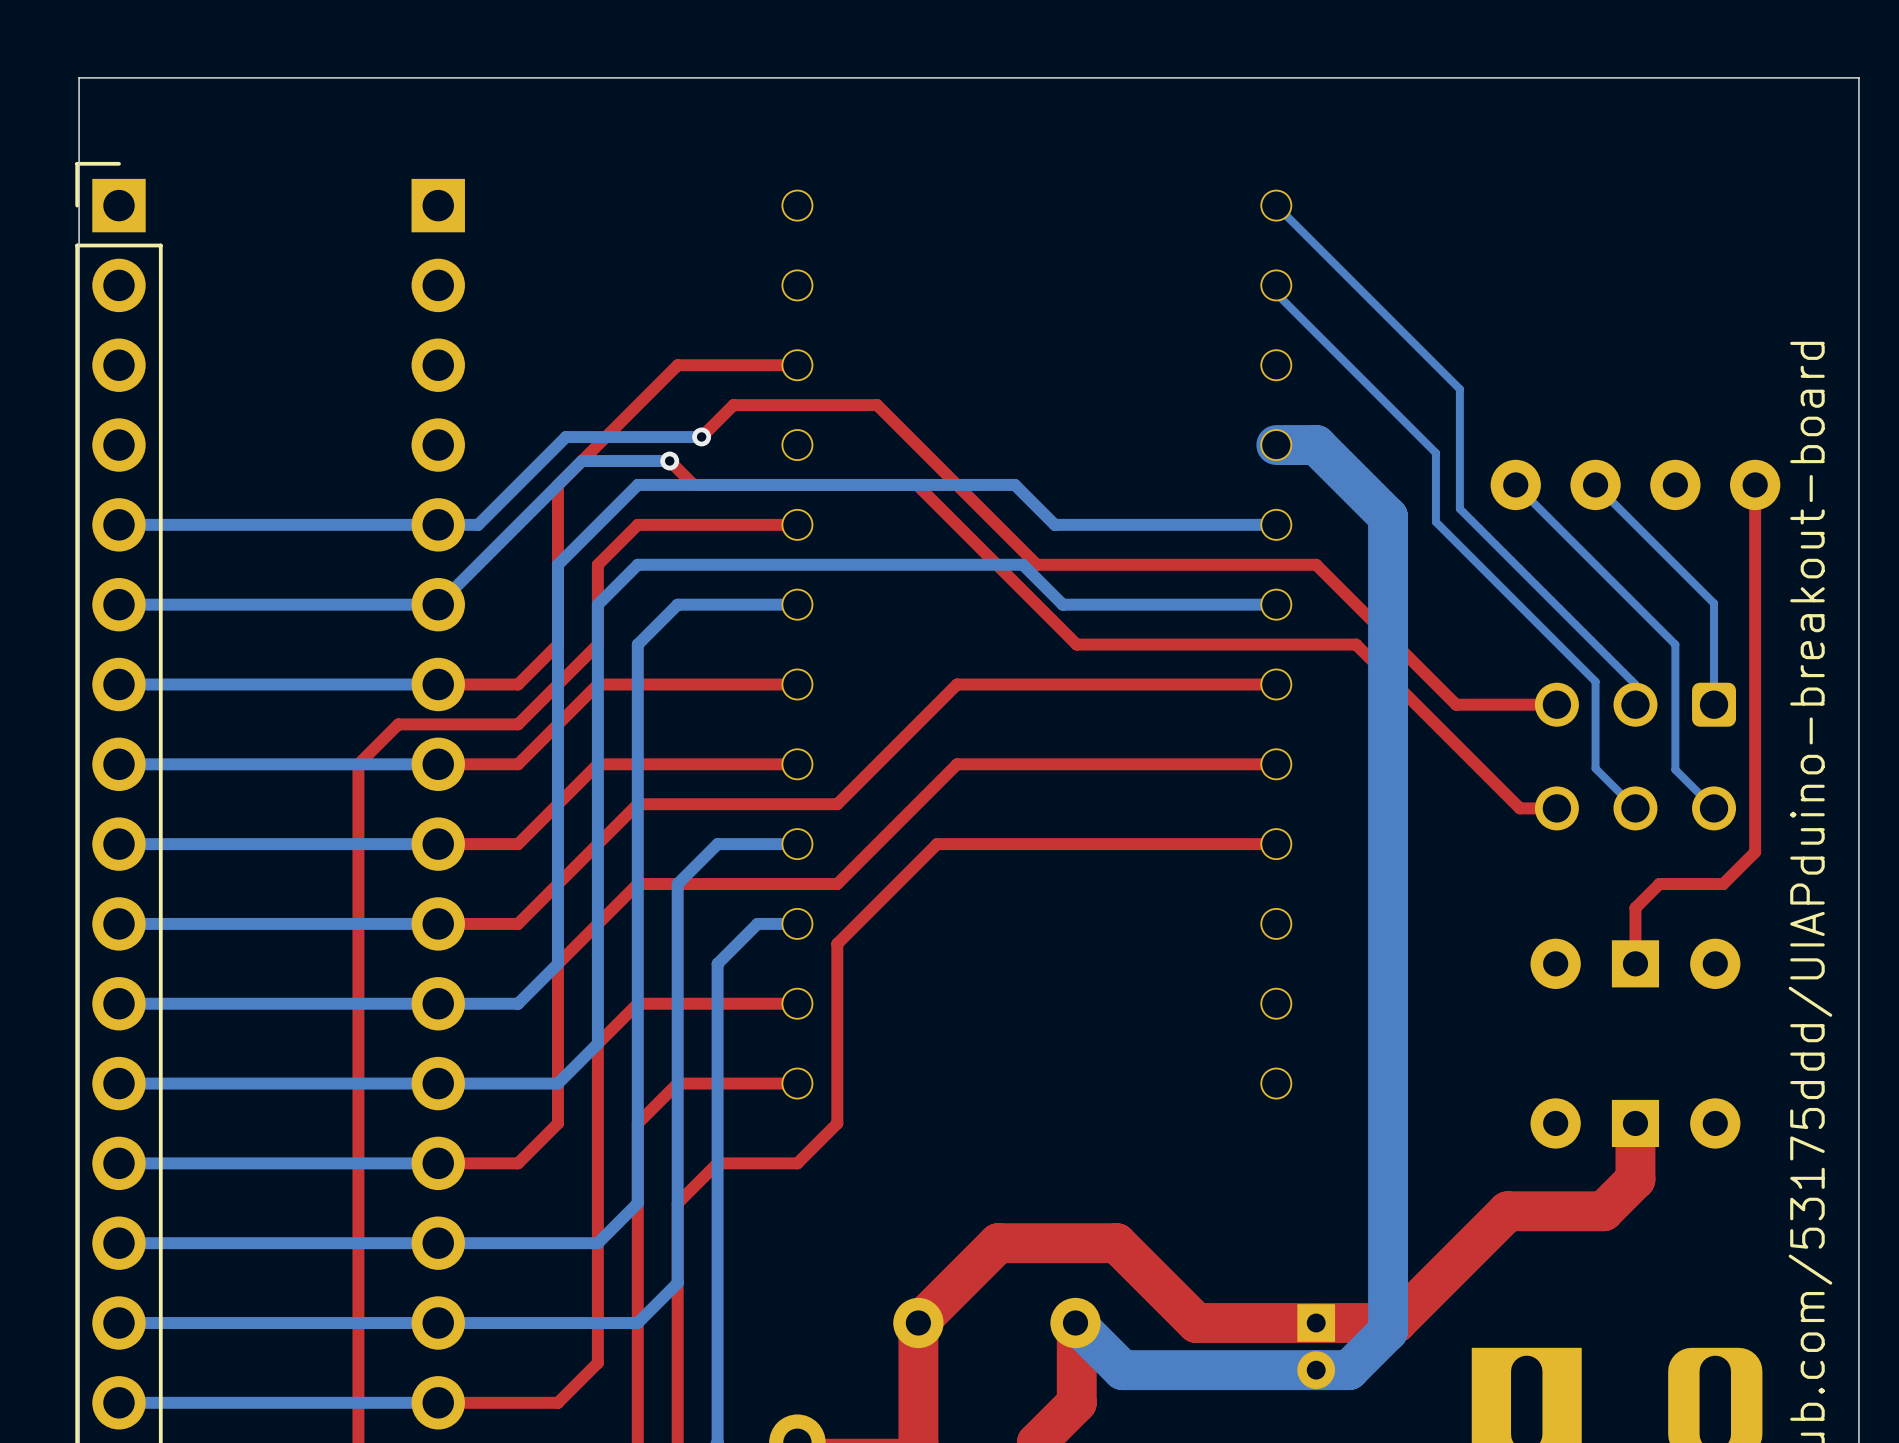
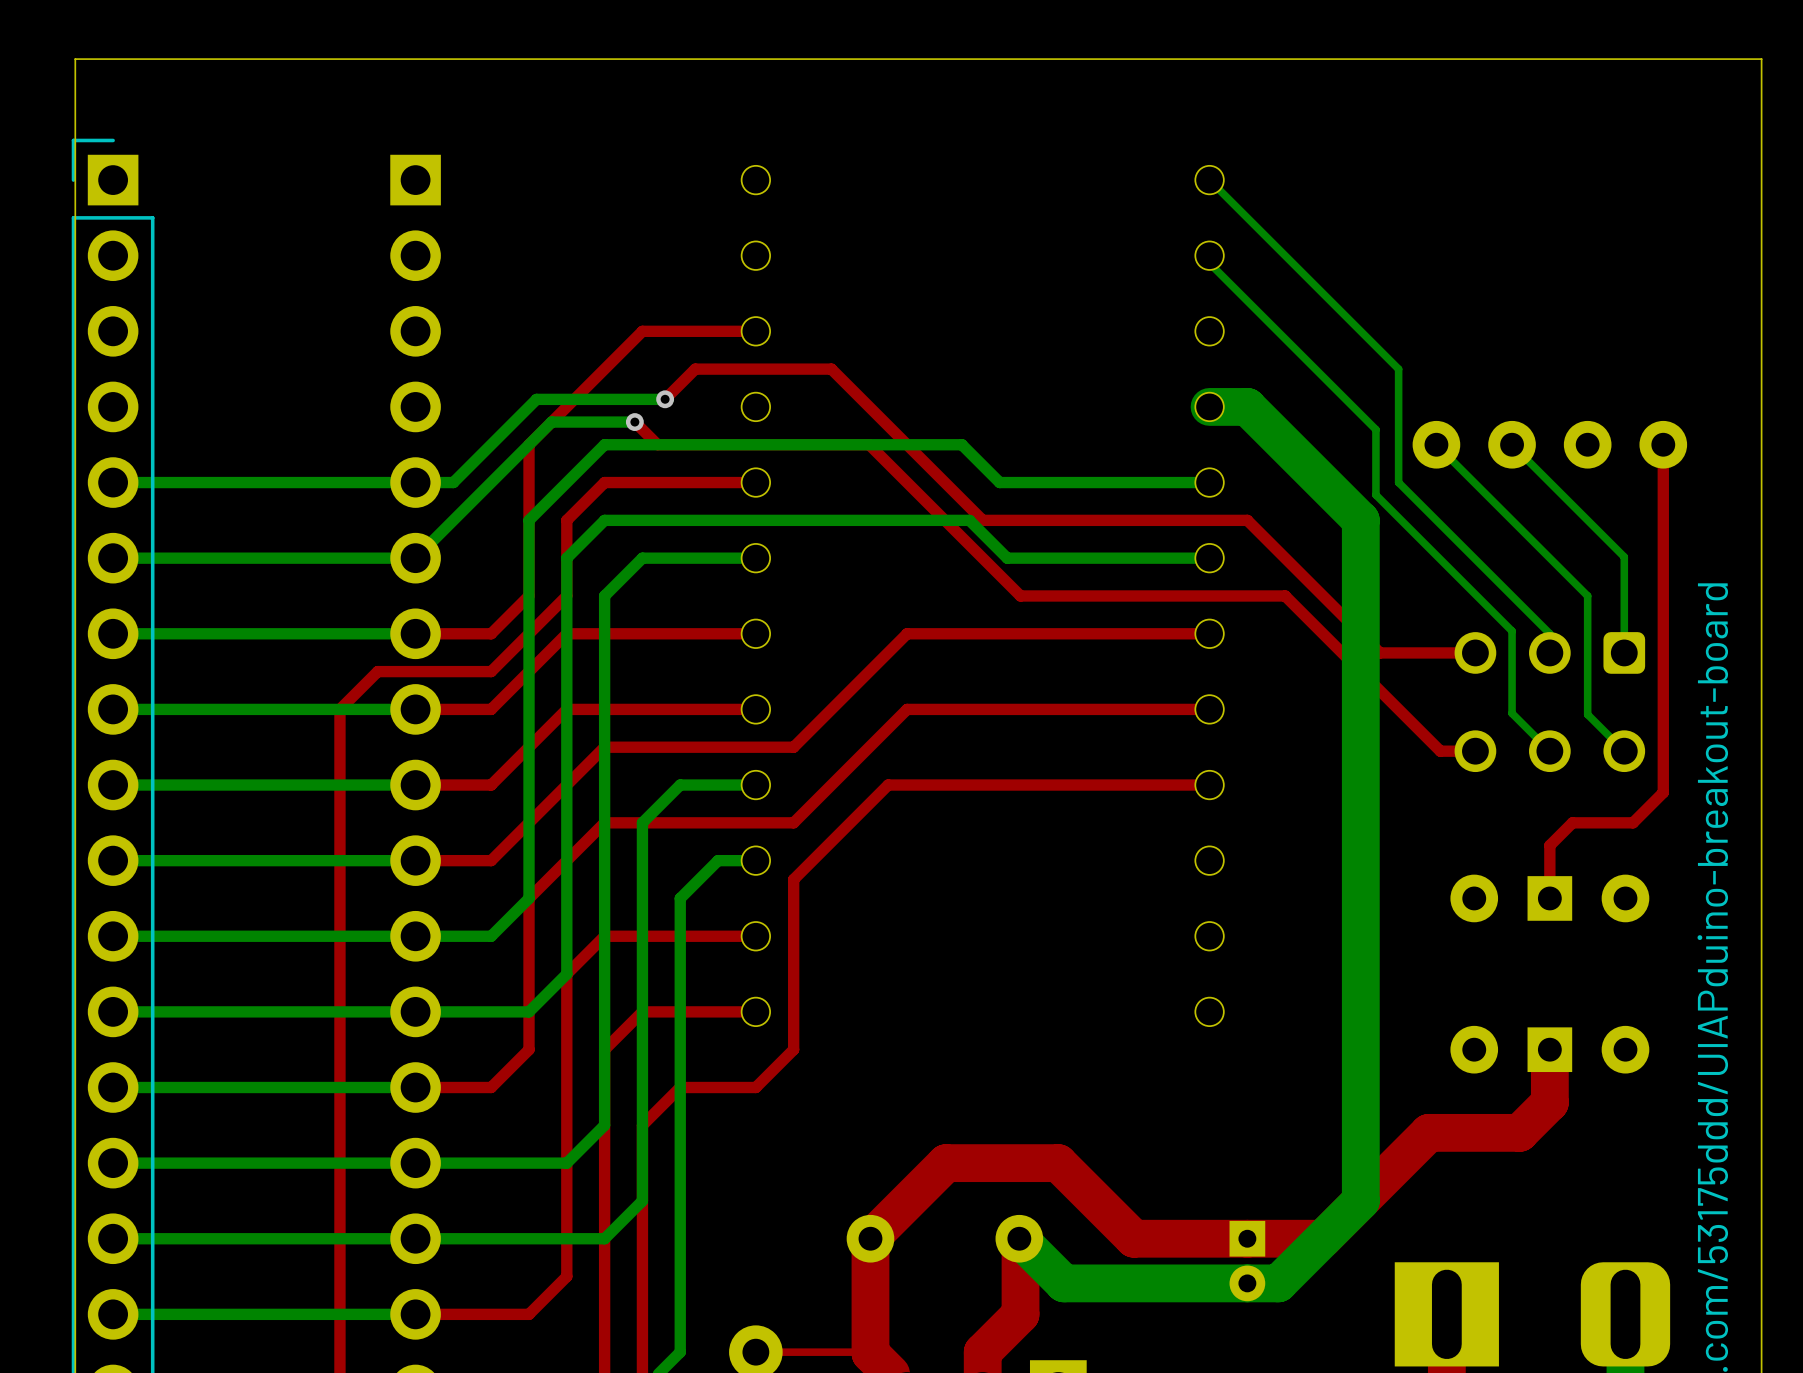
bottom track: (1459, 389) (1459, 508) (1475, 524) -> (1383, 354) (1398, 369) (1398, 482)
bottom track: (1435, 453) (1435, 522) (1451, 537) -> (1360, 414) (1375, 429) (1375, 494)
bottom track: (1388, 516) (1388, 1330) -> (1315, 474) (1360, 520) (1360, 1200) (1315, 1246)

